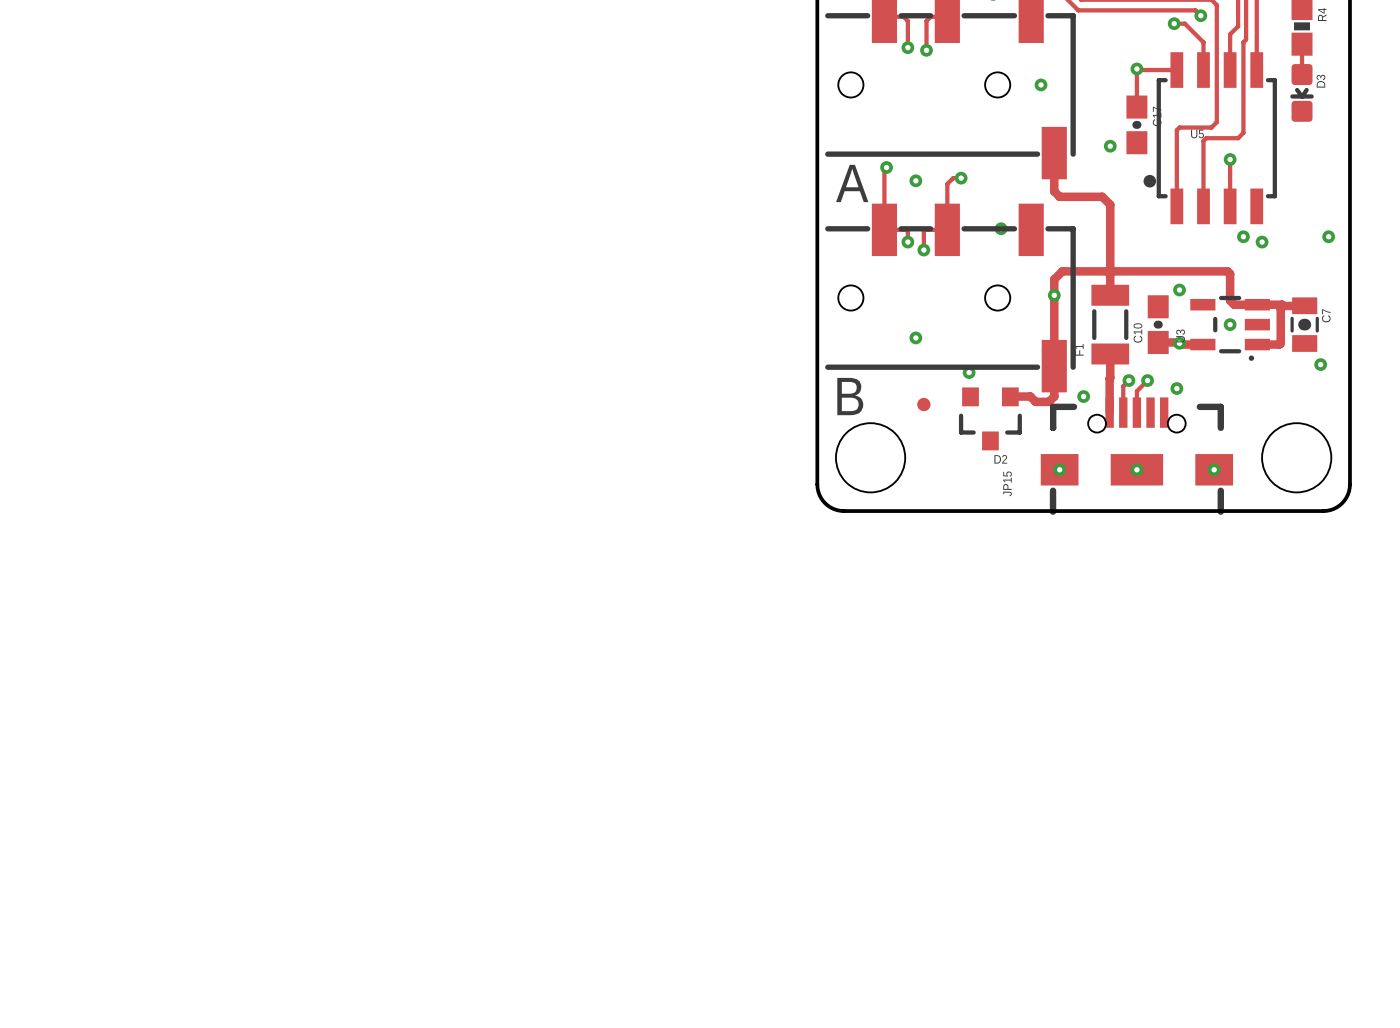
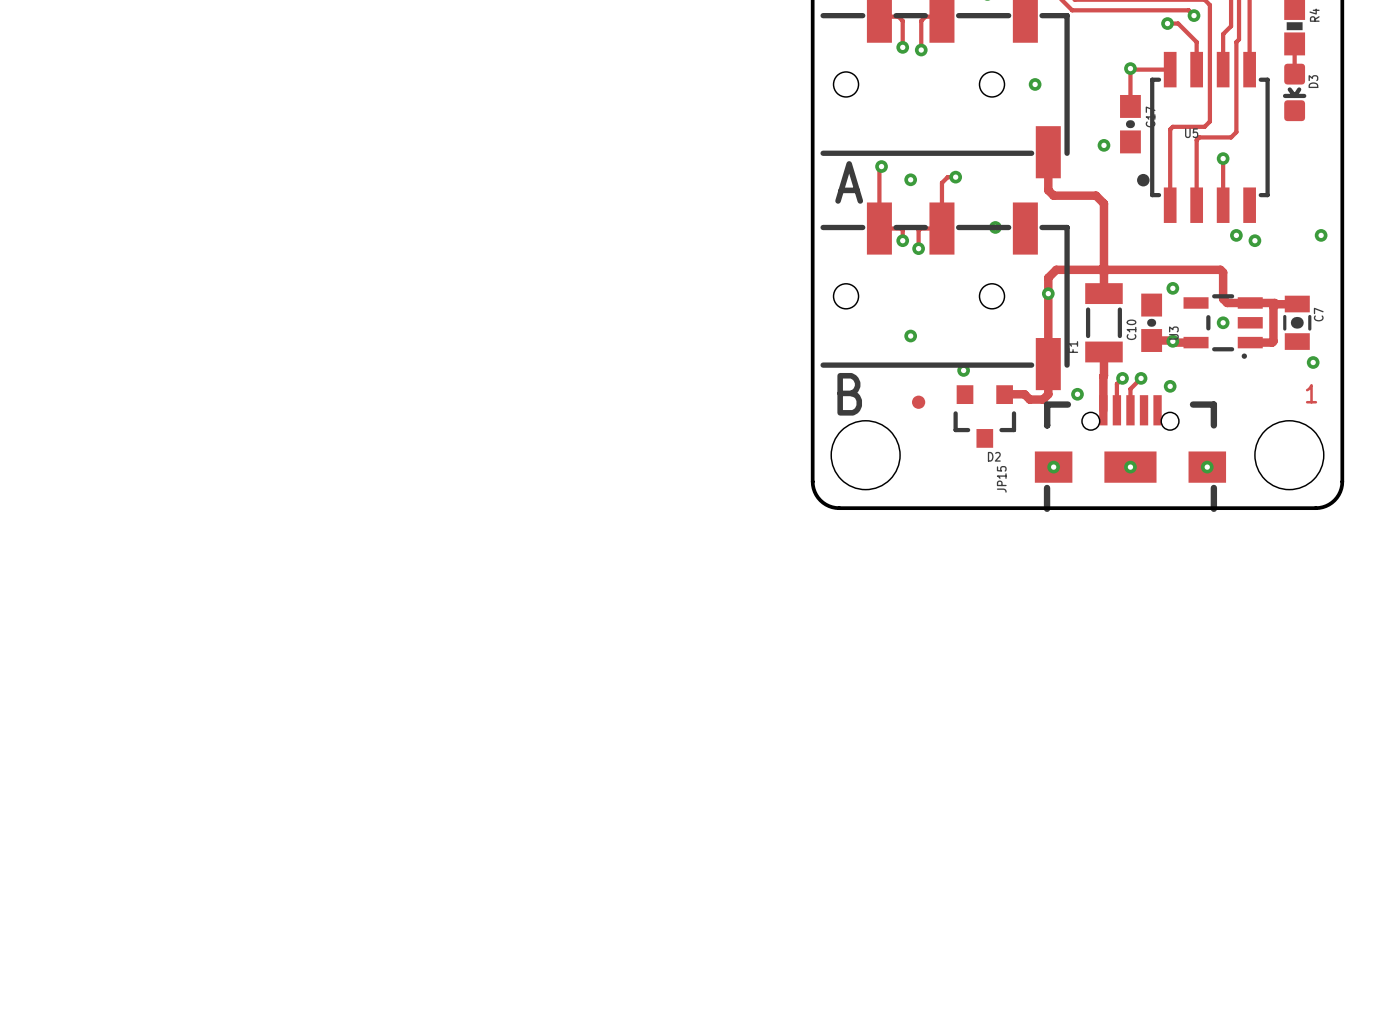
text: none -> 1 (1311, 393)

